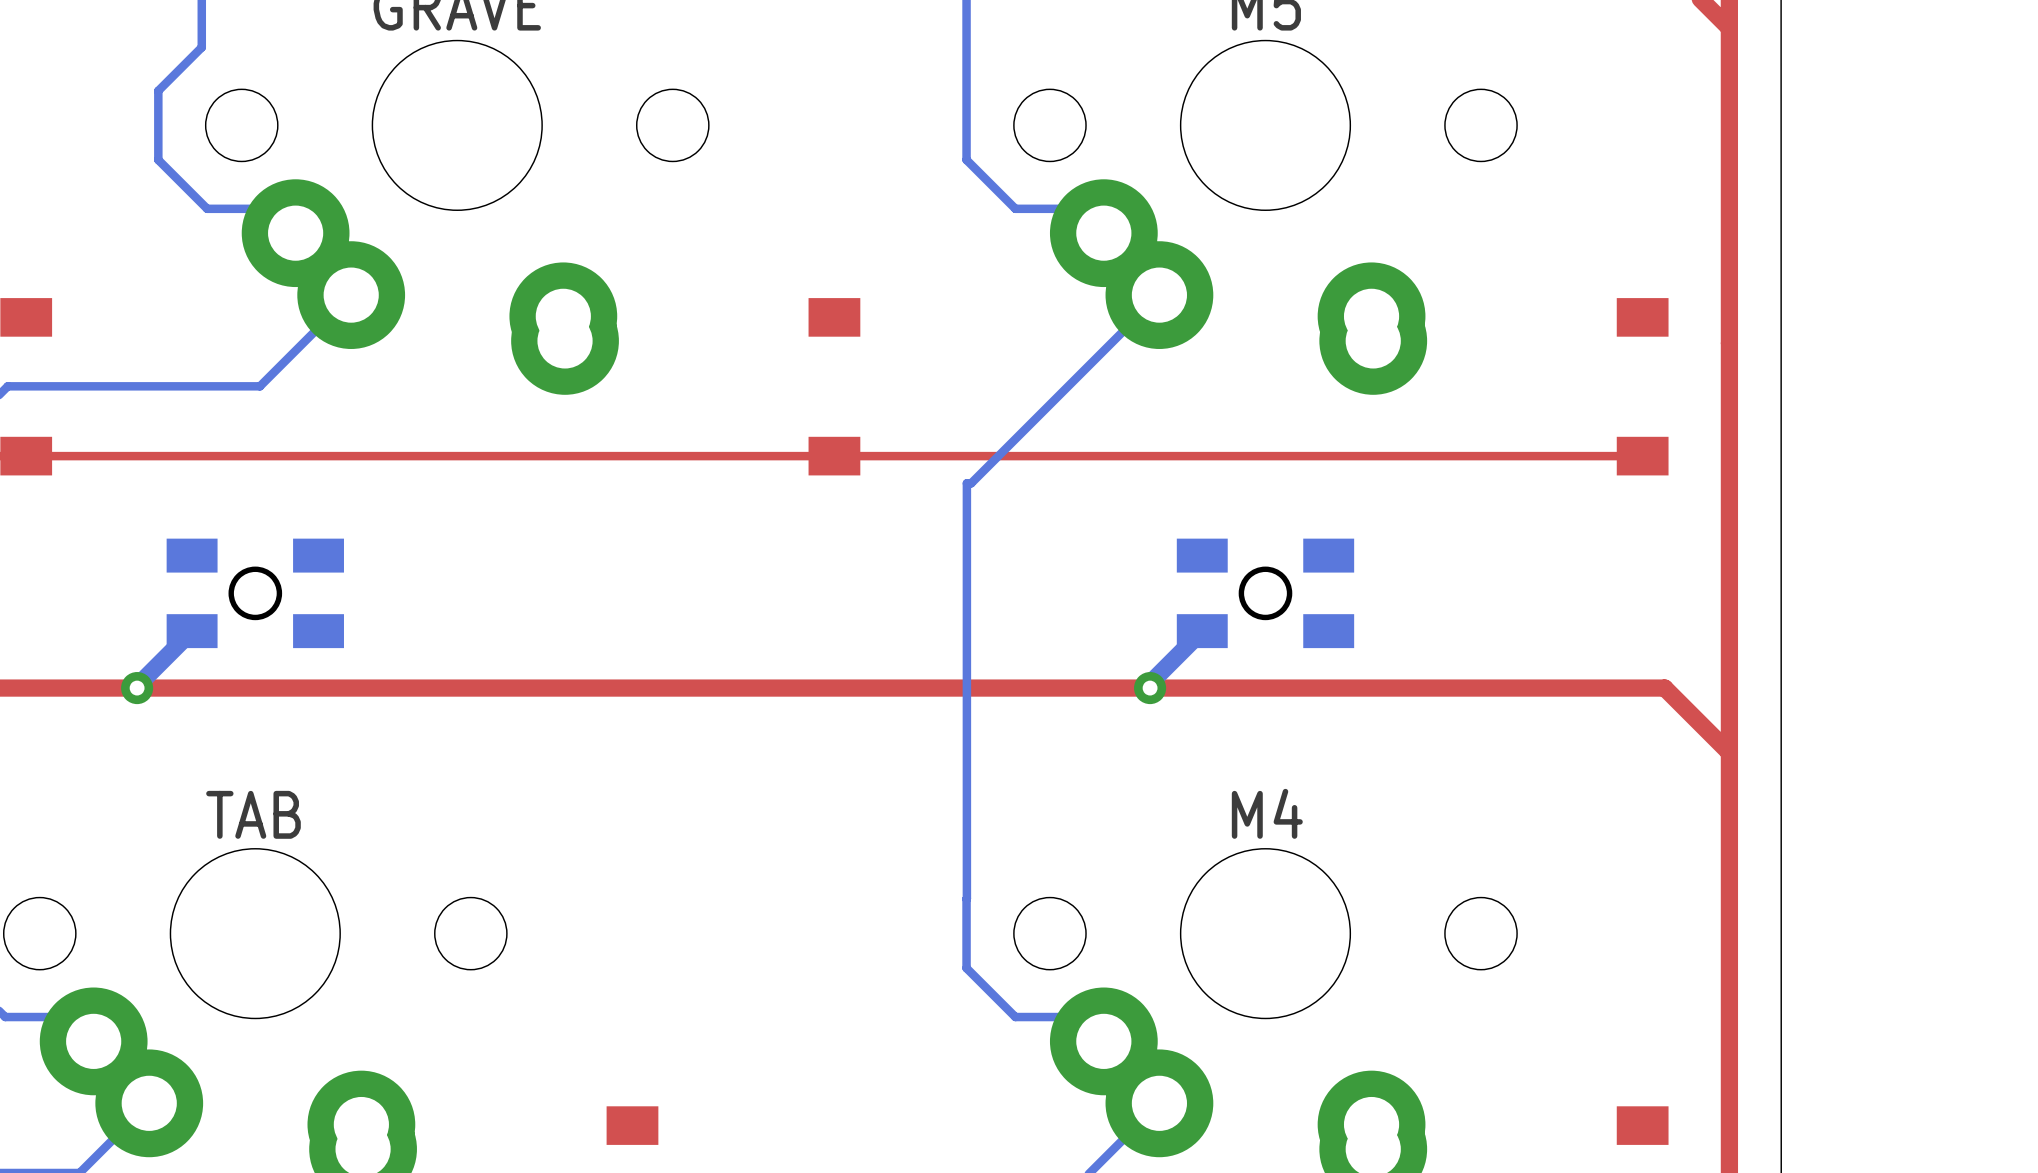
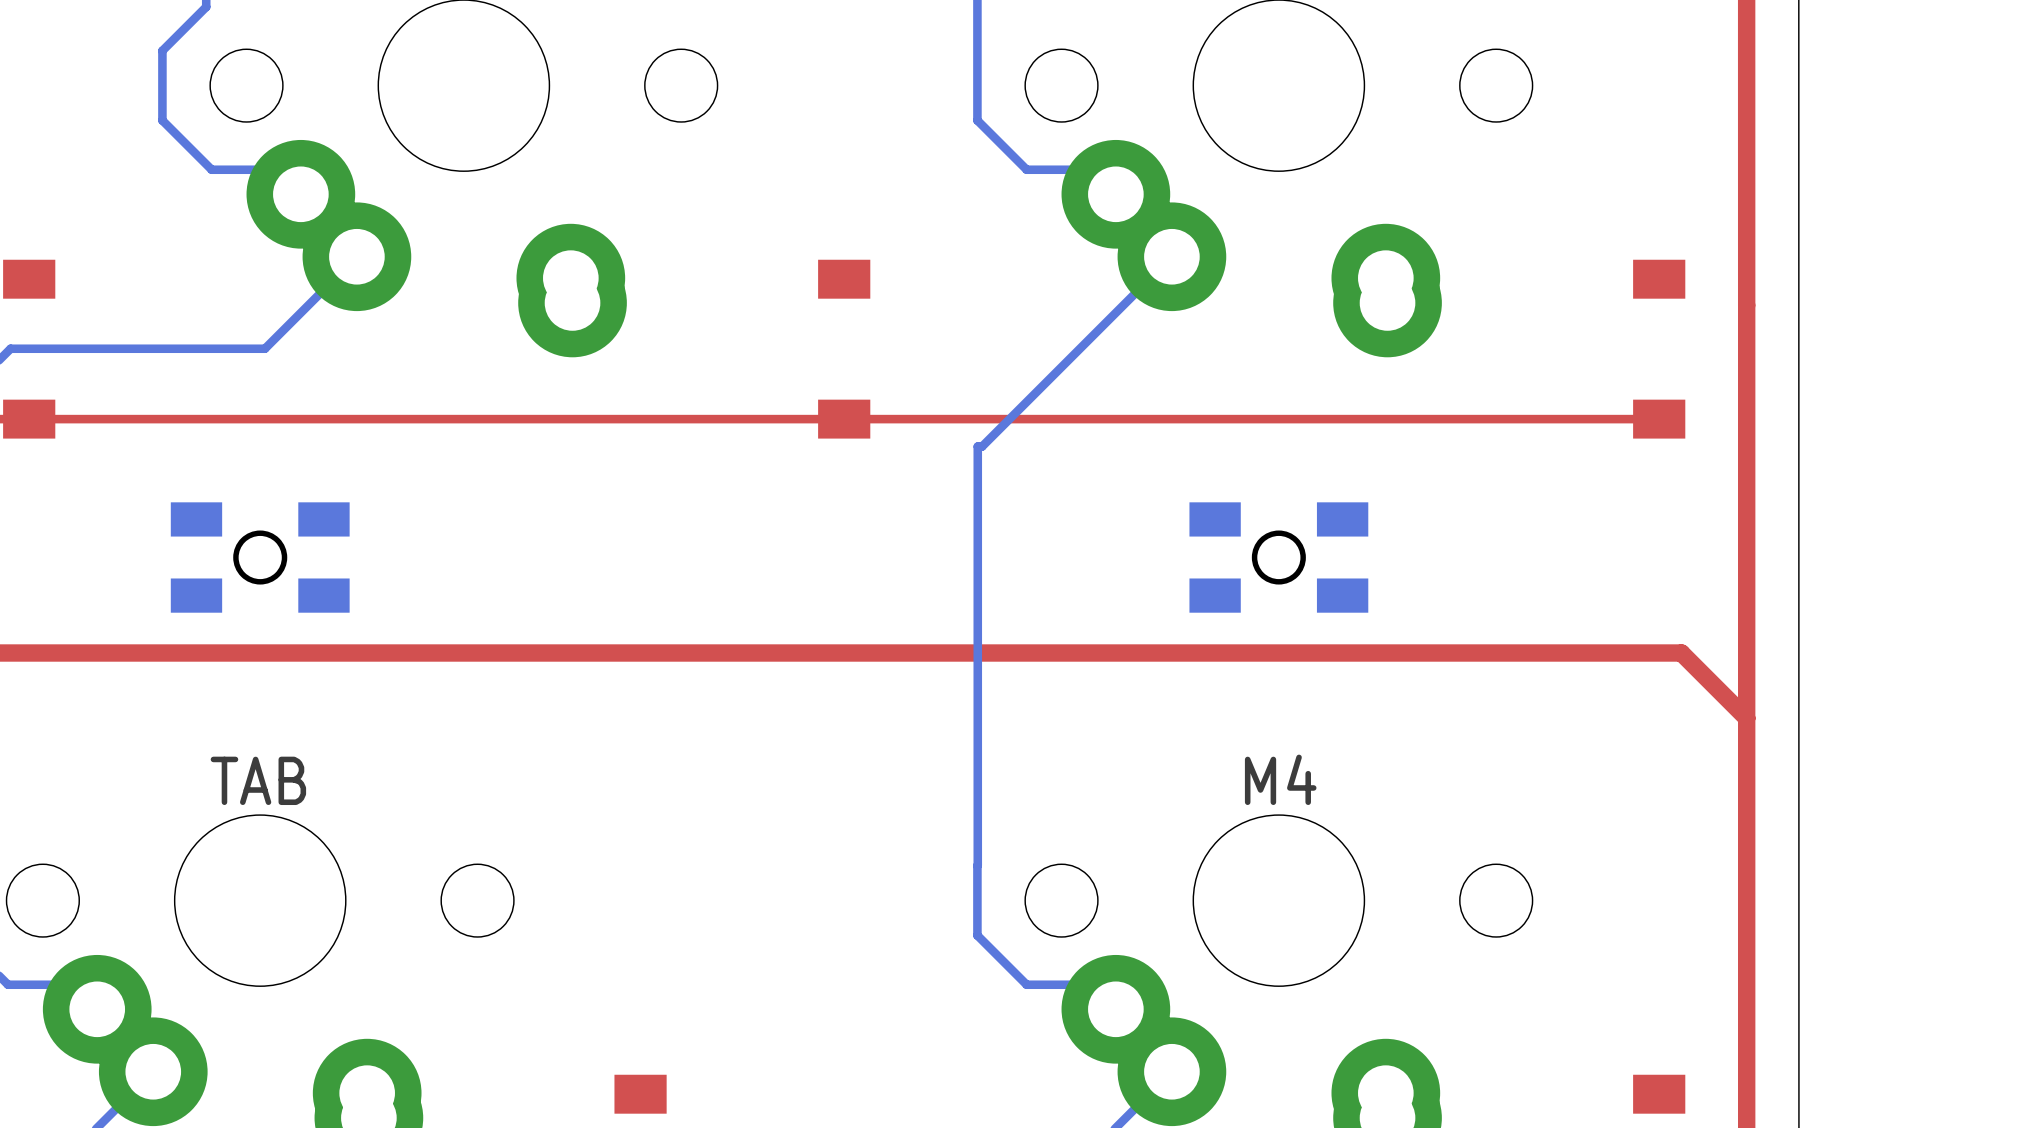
bottom track: (192, 631) (137, 688) -> none
bottom track: (1202, 631) (1150, 683) (1150, 688) -> none
via: (137, 688) -> none
via: (1150, 688) -> none

